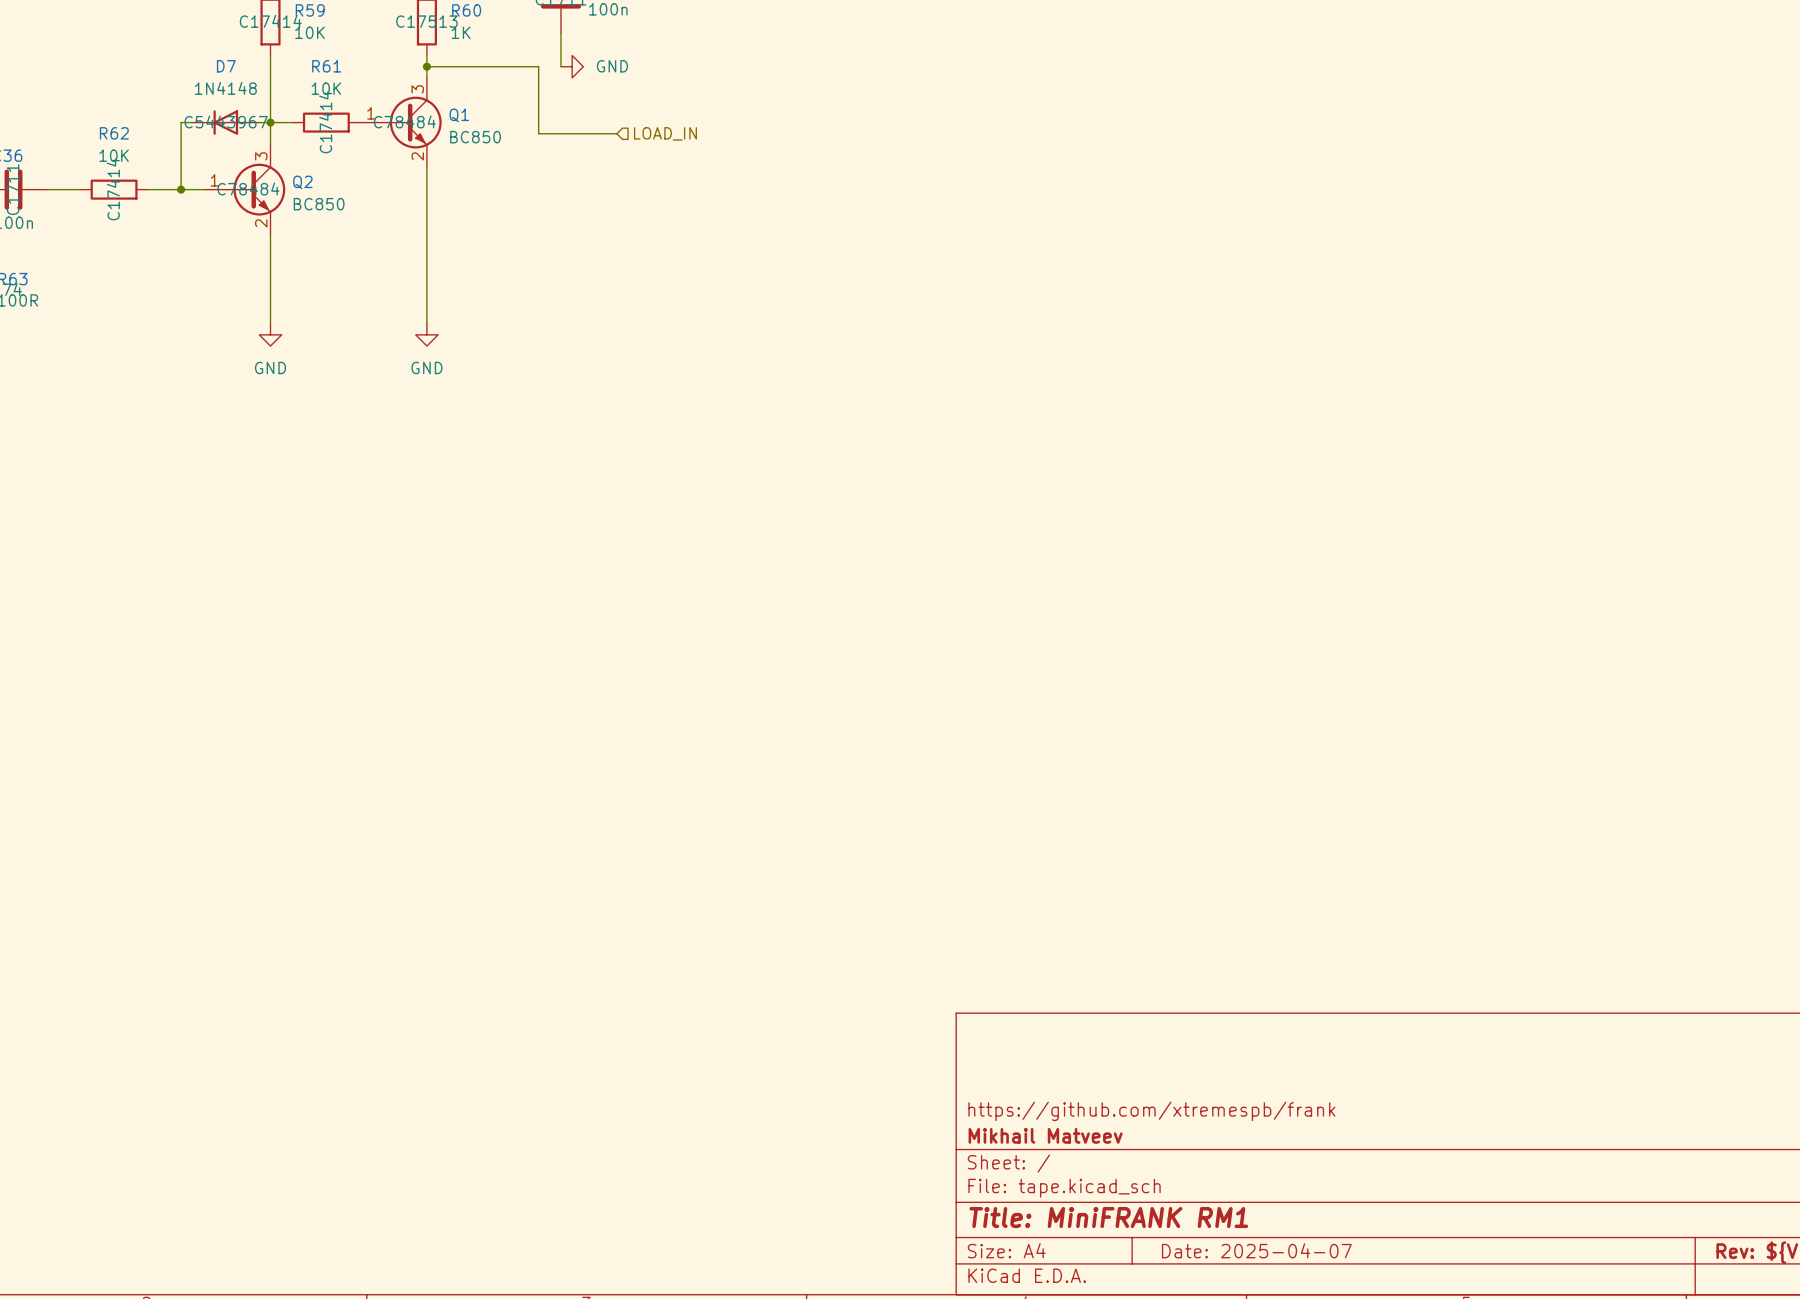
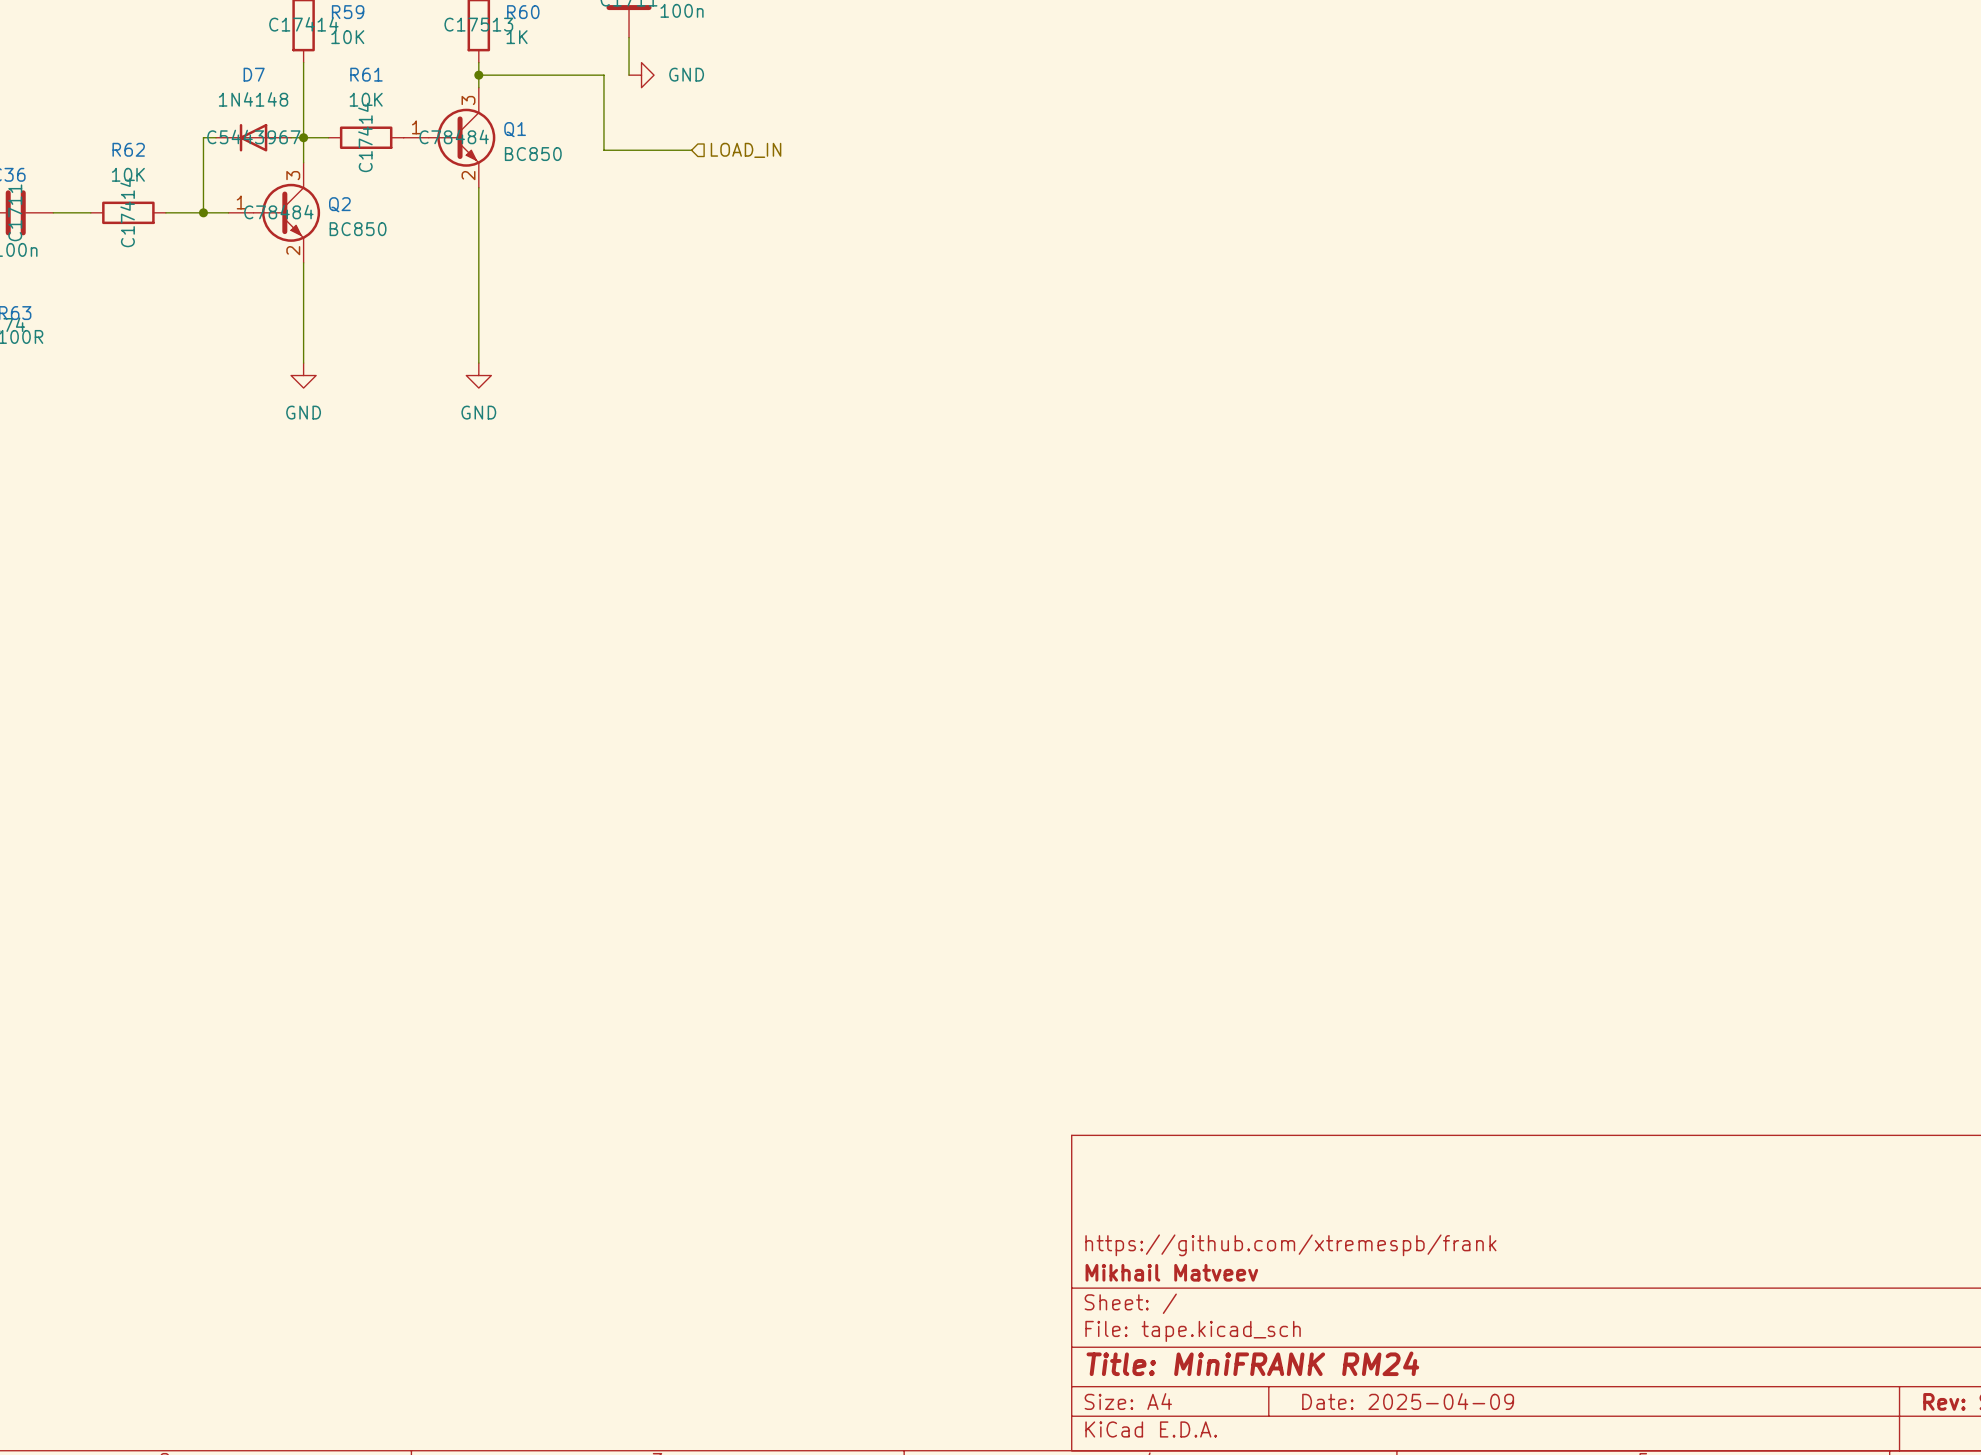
title block: Title: MiniFRANK RM1 (1108, 1217) -> Title: MiniFRANK RM24 (1252, 1363)
title block: Date: 2025-04-07 (1256, 1250) -> Date: 2025-04-09 (1408, 1401)

